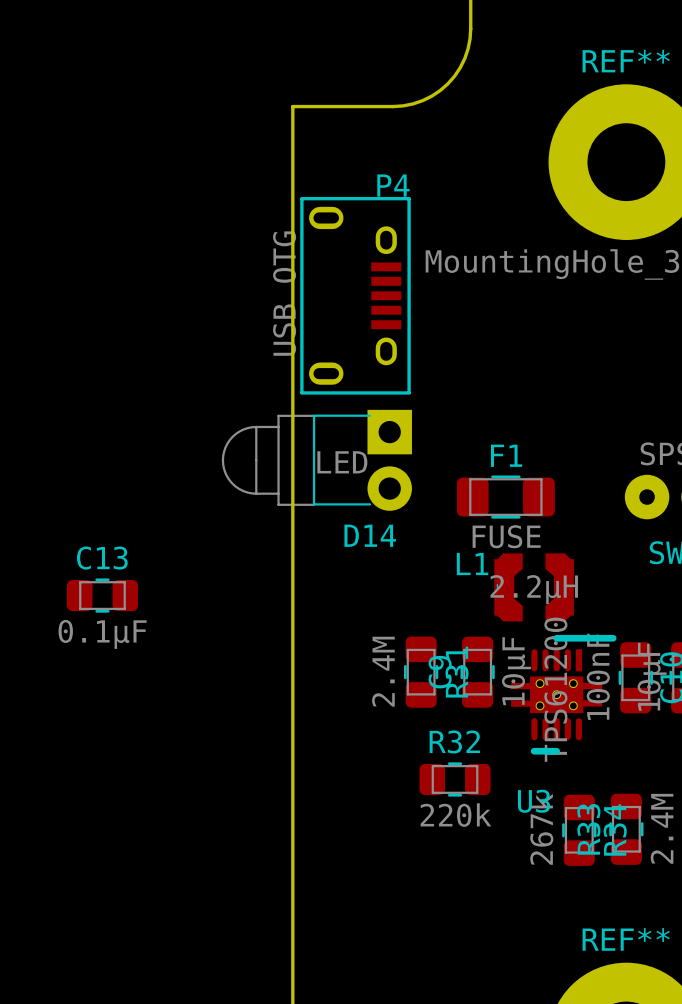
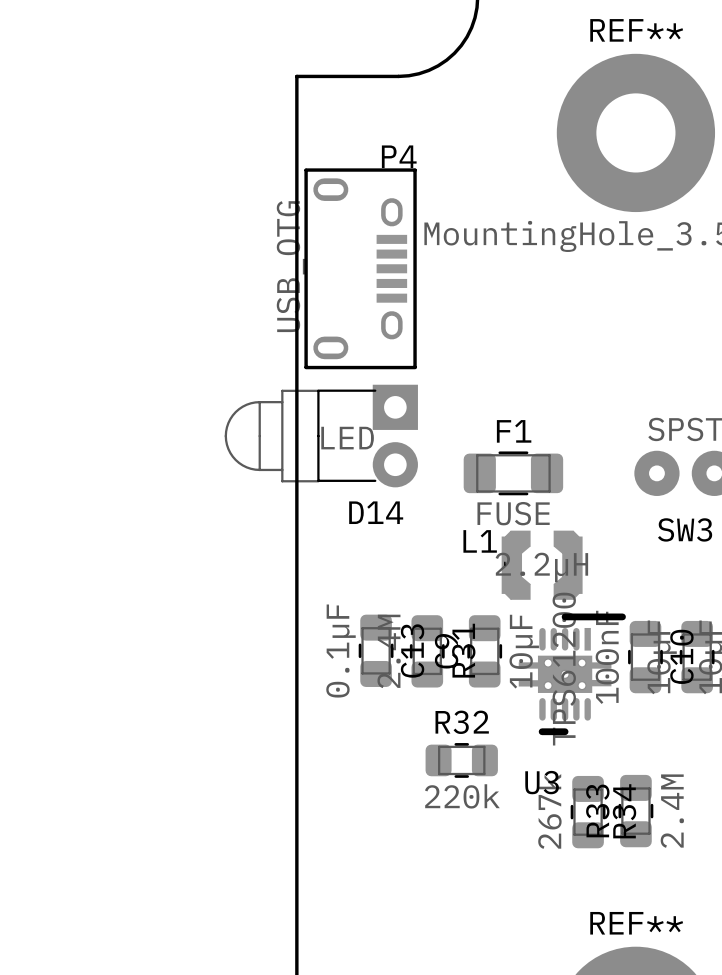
C13 rotation: 0° (102, 595) -> 90° clockwise (376, 650)
C13 position: (102, 595) -> (376, 650)

